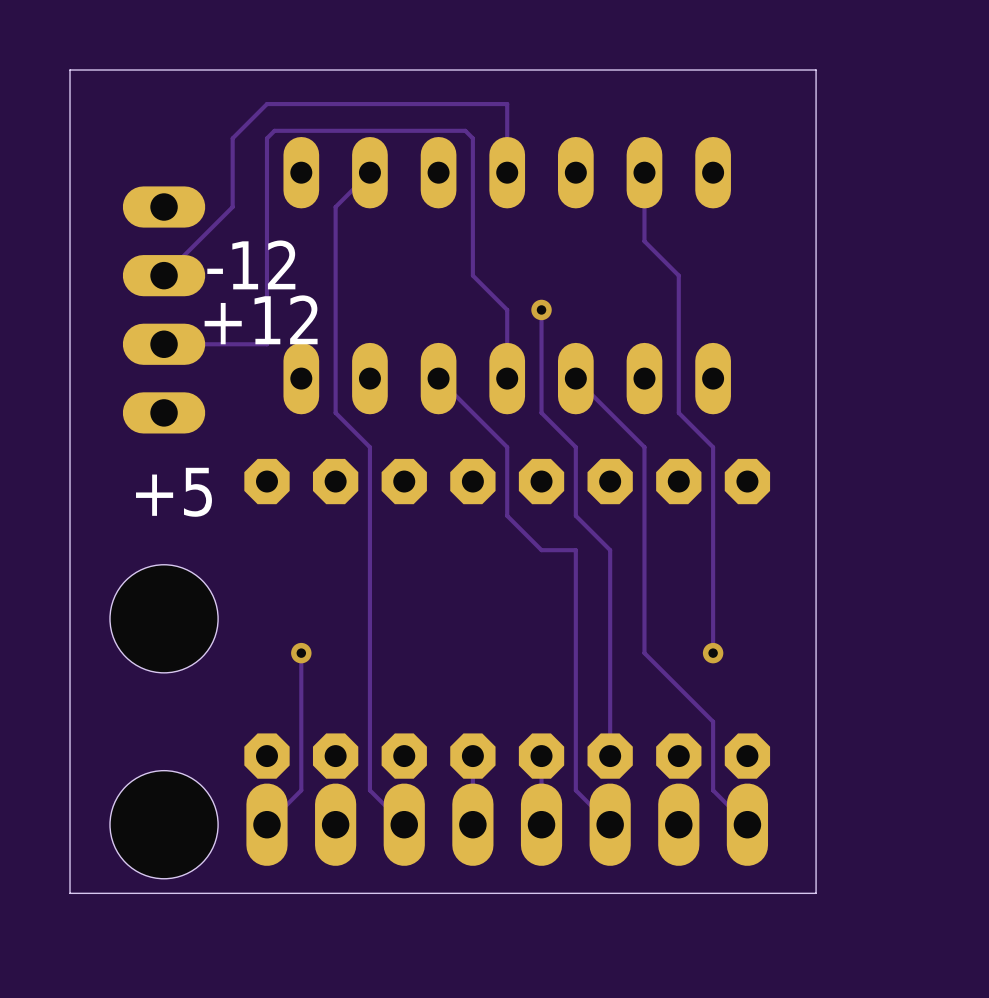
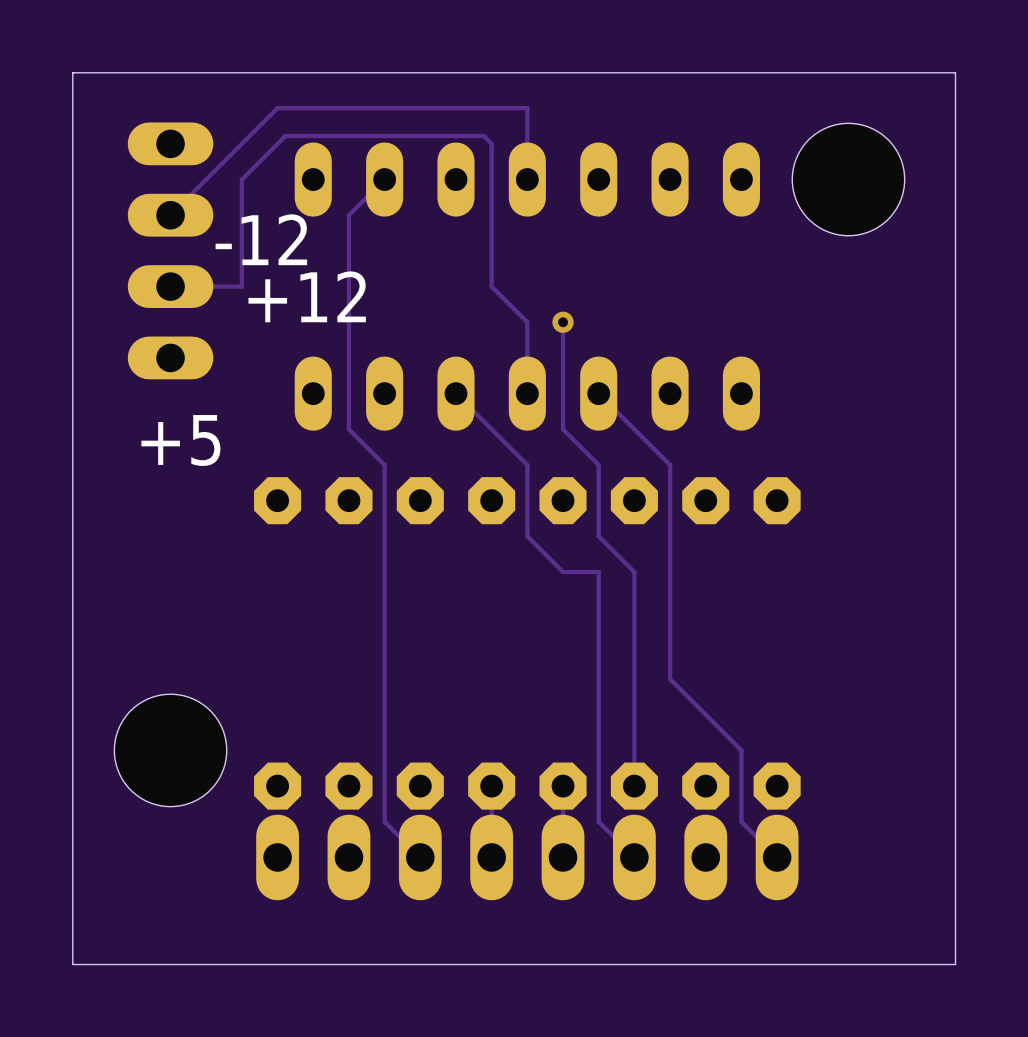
board edge: (816, 70) (816, 893) (70, 893) -> (848, 72) (955, 72) (955, 964) (72, 964) (72, 928)
track: (232, 138) (232, 172) -> (277, 143) (241, 179)
track: none -> (241, 143) (170, 215)
track: (266, 138) (266, 344) (164, 344) -> none
track: (644, 172) (644, 241) (678, 275) (678, 412) (713, 447) (713, 653) -> none
hole: none -> (848, 179)
track: (232, 207) (164, 275) -> (241, 215) (241, 286) (170, 286)
text position: -12 (251, 264) -> -12 (261, 239)
part position: (164, 309) -> (170, 250)
text position: +12 (261, 319) -> +12 (307, 296)
text position: +5 (173, 492) -> +5 (180, 440)
hole: (164, 618) -> none
track: (301, 653) (301, 790) (266, 824) -> none
via: (301, 653) -> none
via: (713, 653) -> none
hole: none -> (170, 750)
hole: (164, 824) -> none

